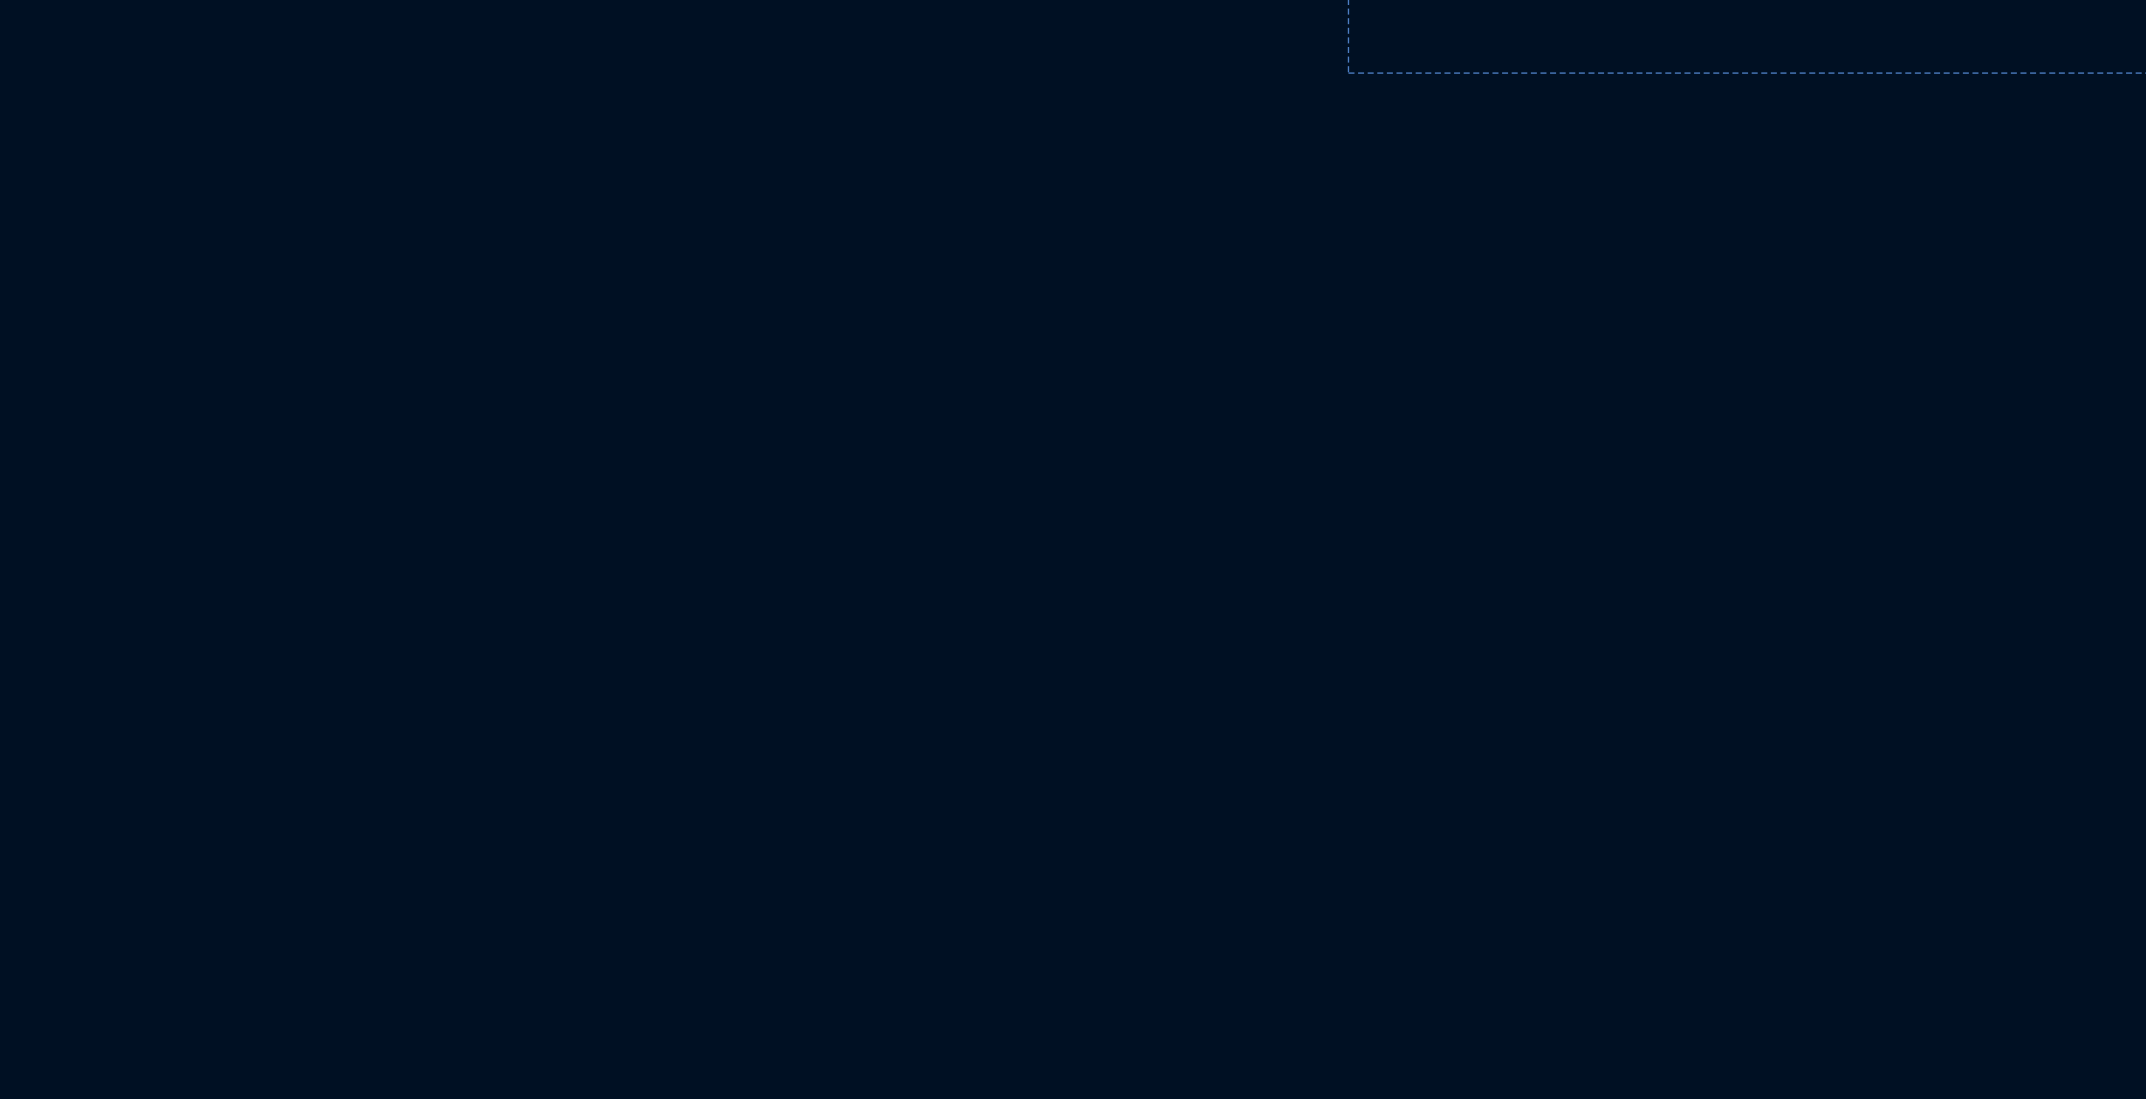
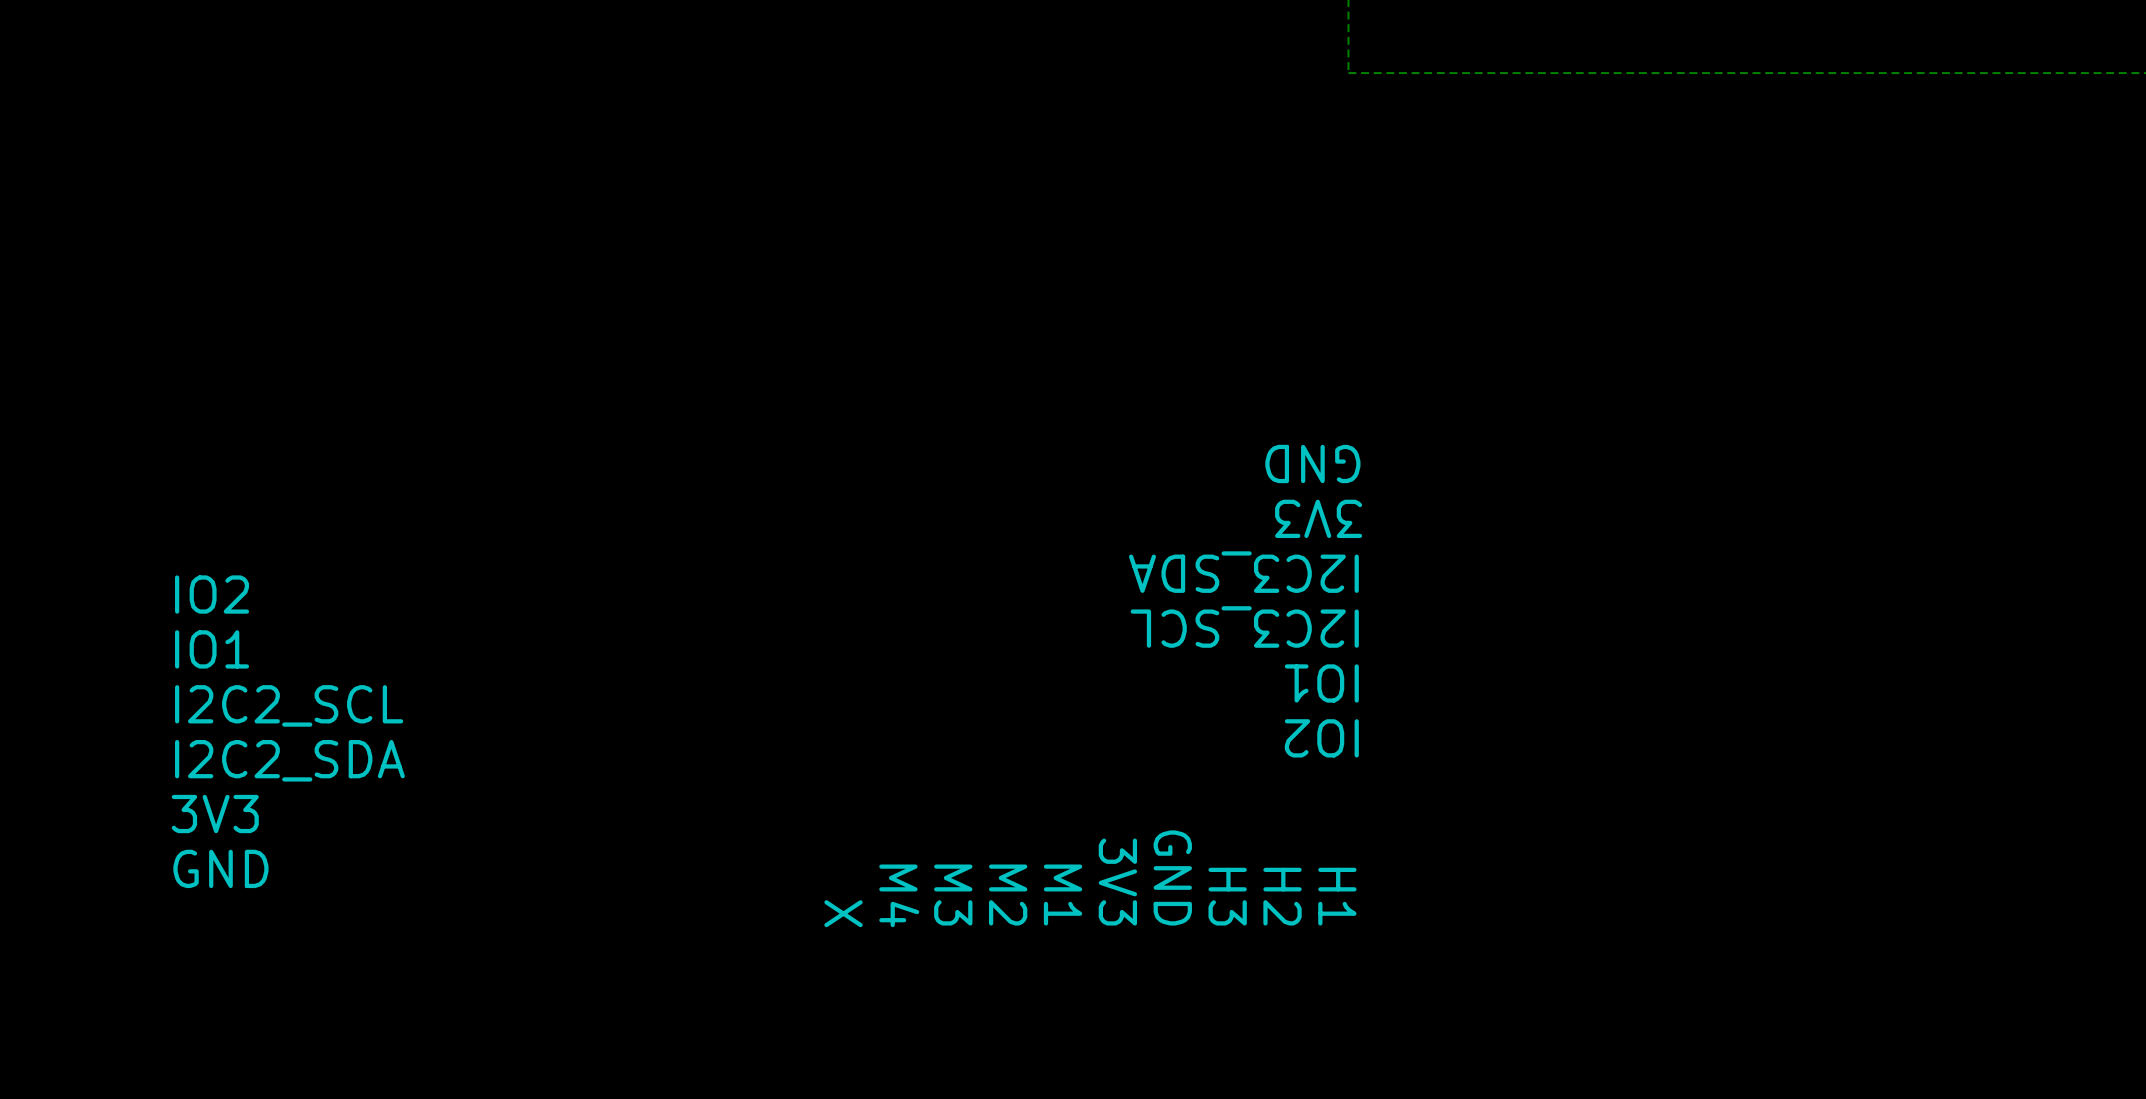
text: none -> GND (1312, 463)
text: none -> 3V3 (1318, 518)
text: none -> I2C3_SDA (1243, 572)
text: none -> IO2 (212, 594)
text: none -> I2C3_SCL (1244, 626)
text: none -> IO1 (212, 649)
text: none -> IO1 (1321, 683)
text: none -> I2C2_SCL (289, 705)
text: none -> IO2 (1321, 738)
text: none -> I2C2_SDA (289, 760)
text: none -> 3V3 (215, 814)
text: none -> GND (220, 868)
text: none -> GND (1172, 877)
text: none -> 3V3 (1117, 882)
text: none -> M4 (899, 895)
text: none -> M3 (953, 895)
text: none -> M2 (1008, 895)
text: none -> M1 (1063, 895)
text: none -> H3 (1227, 896)
text: none -> H2 (1282, 896)
text: none -> H1 (1337, 896)
text: none -> X (843, 913)

